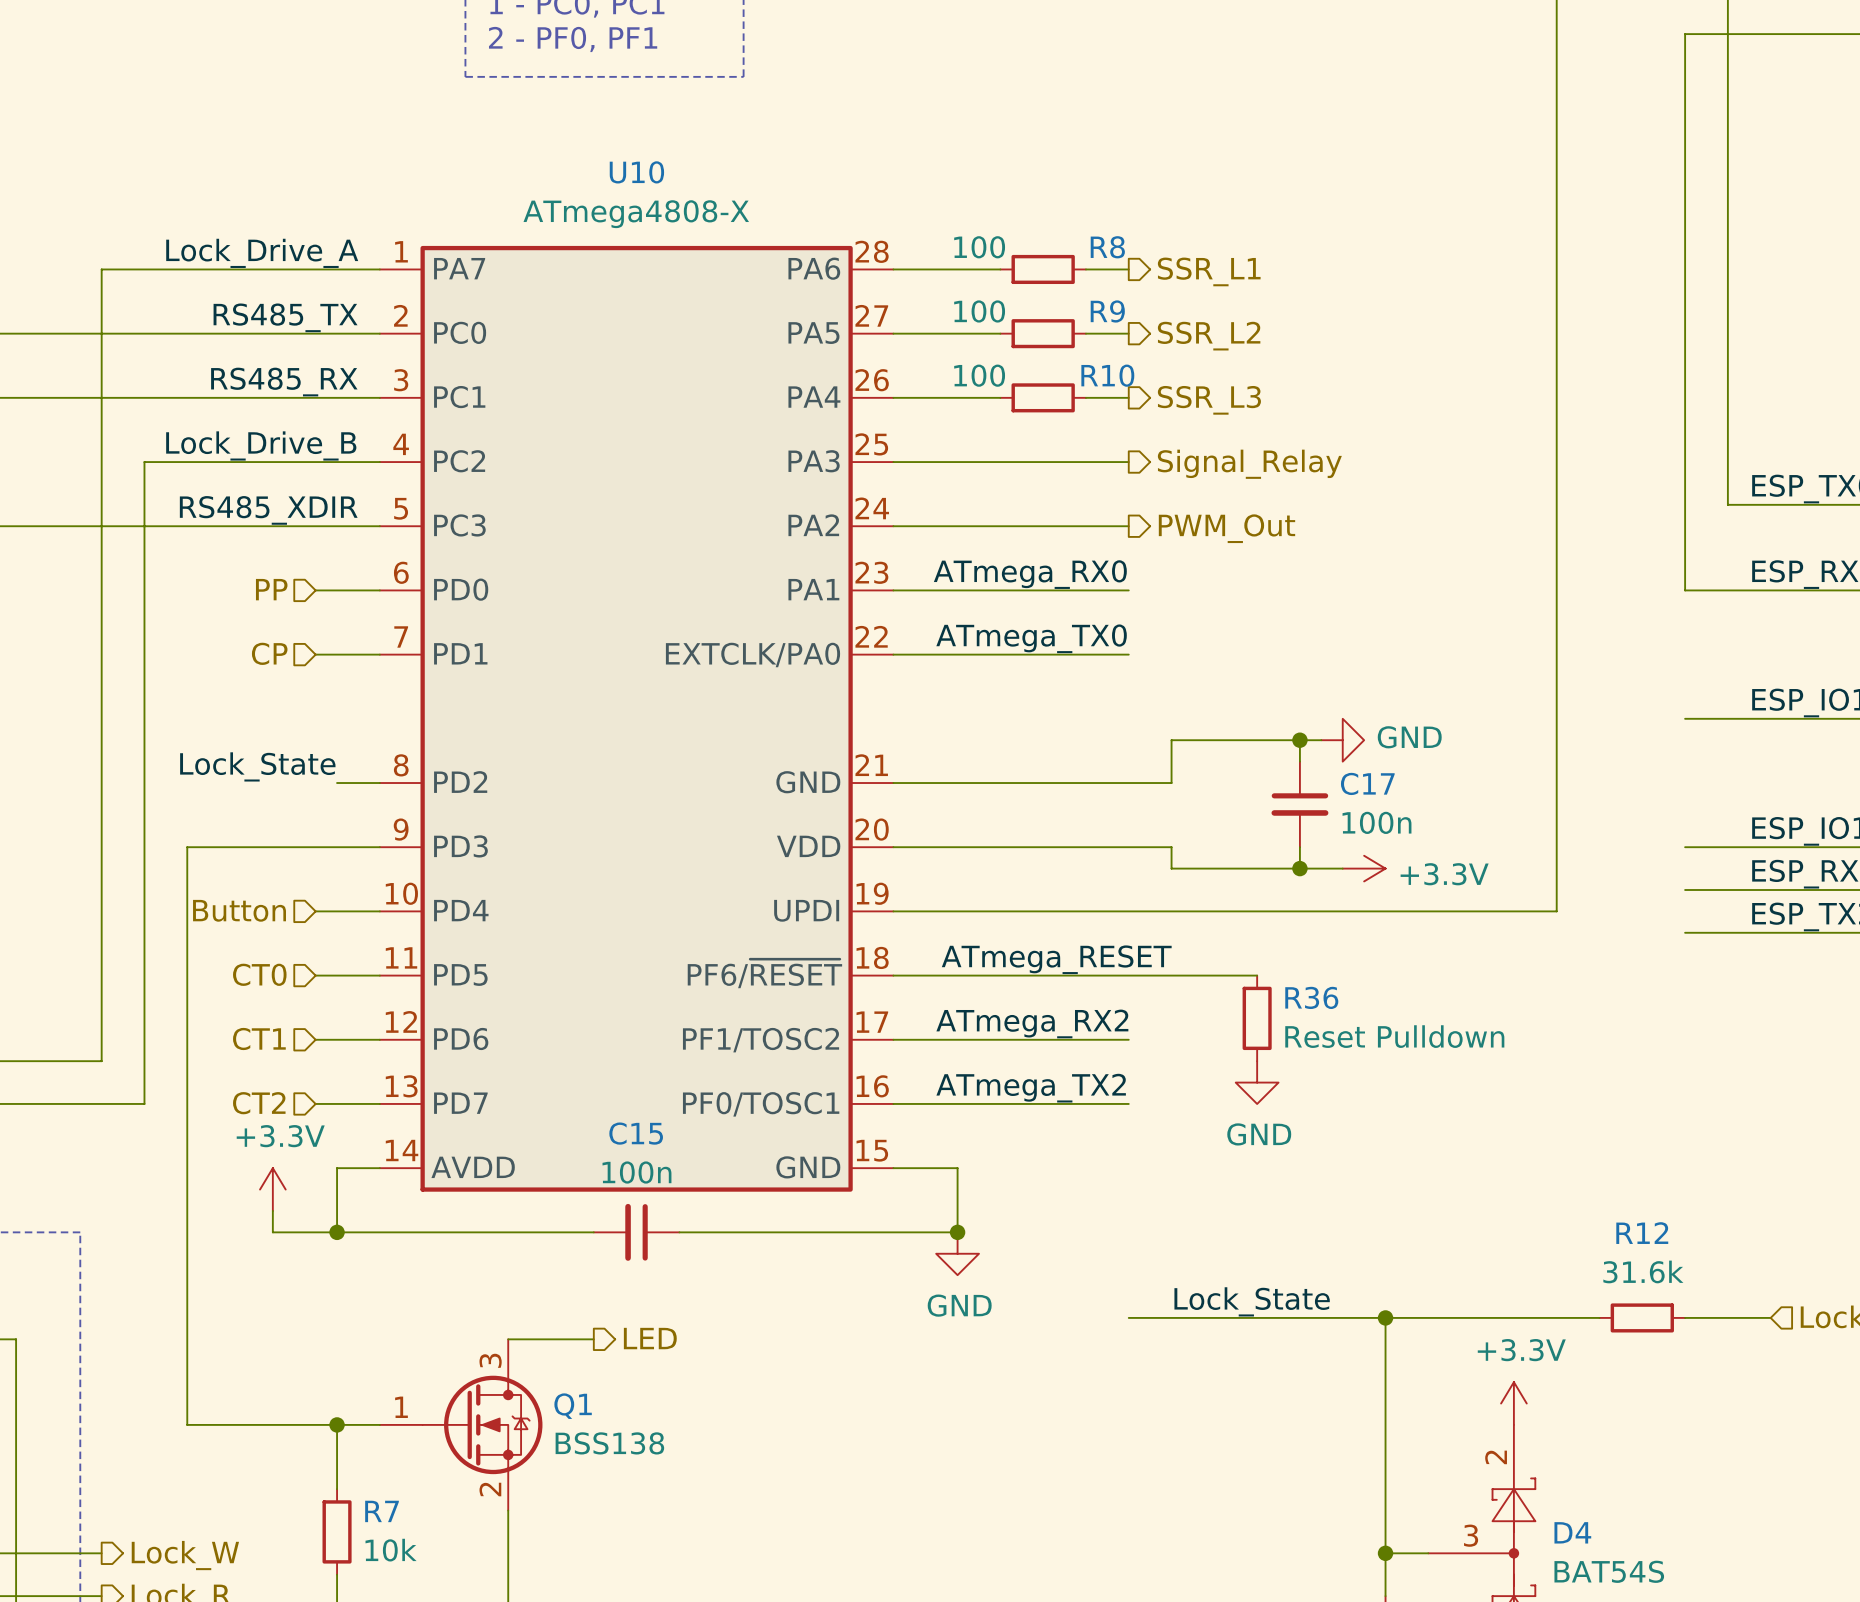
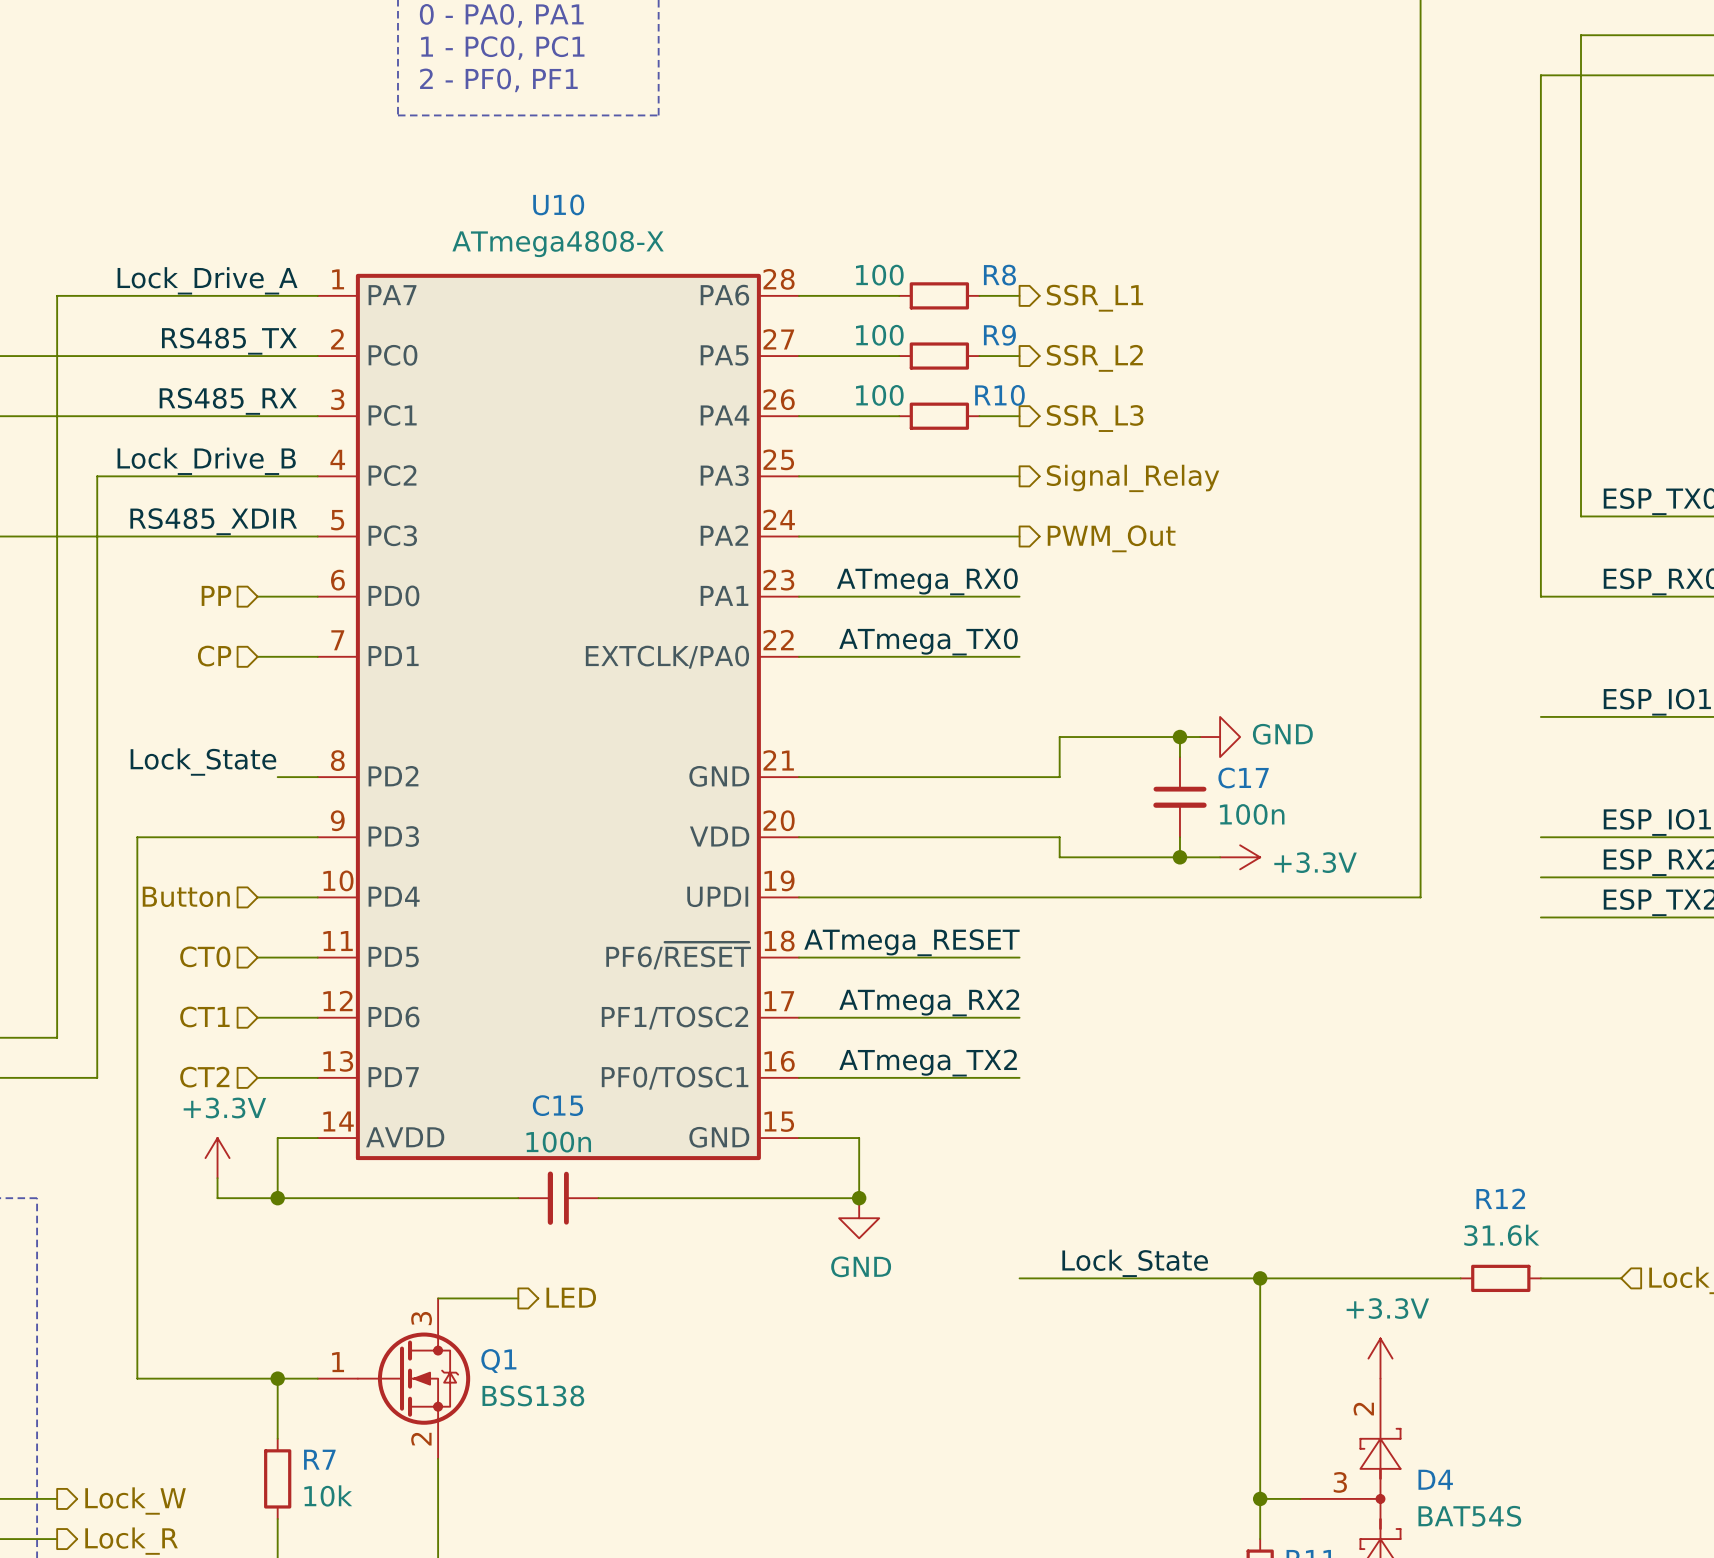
label position: ATmega_RESET (1056, 959) -> ATmega_RESET (911, 942)
wire: (1128, 975) (1257, 975) -> none
R36: Reset Pulldown (1257, 1018) -> none
power symbol: GND (1257, 1082) -> none

